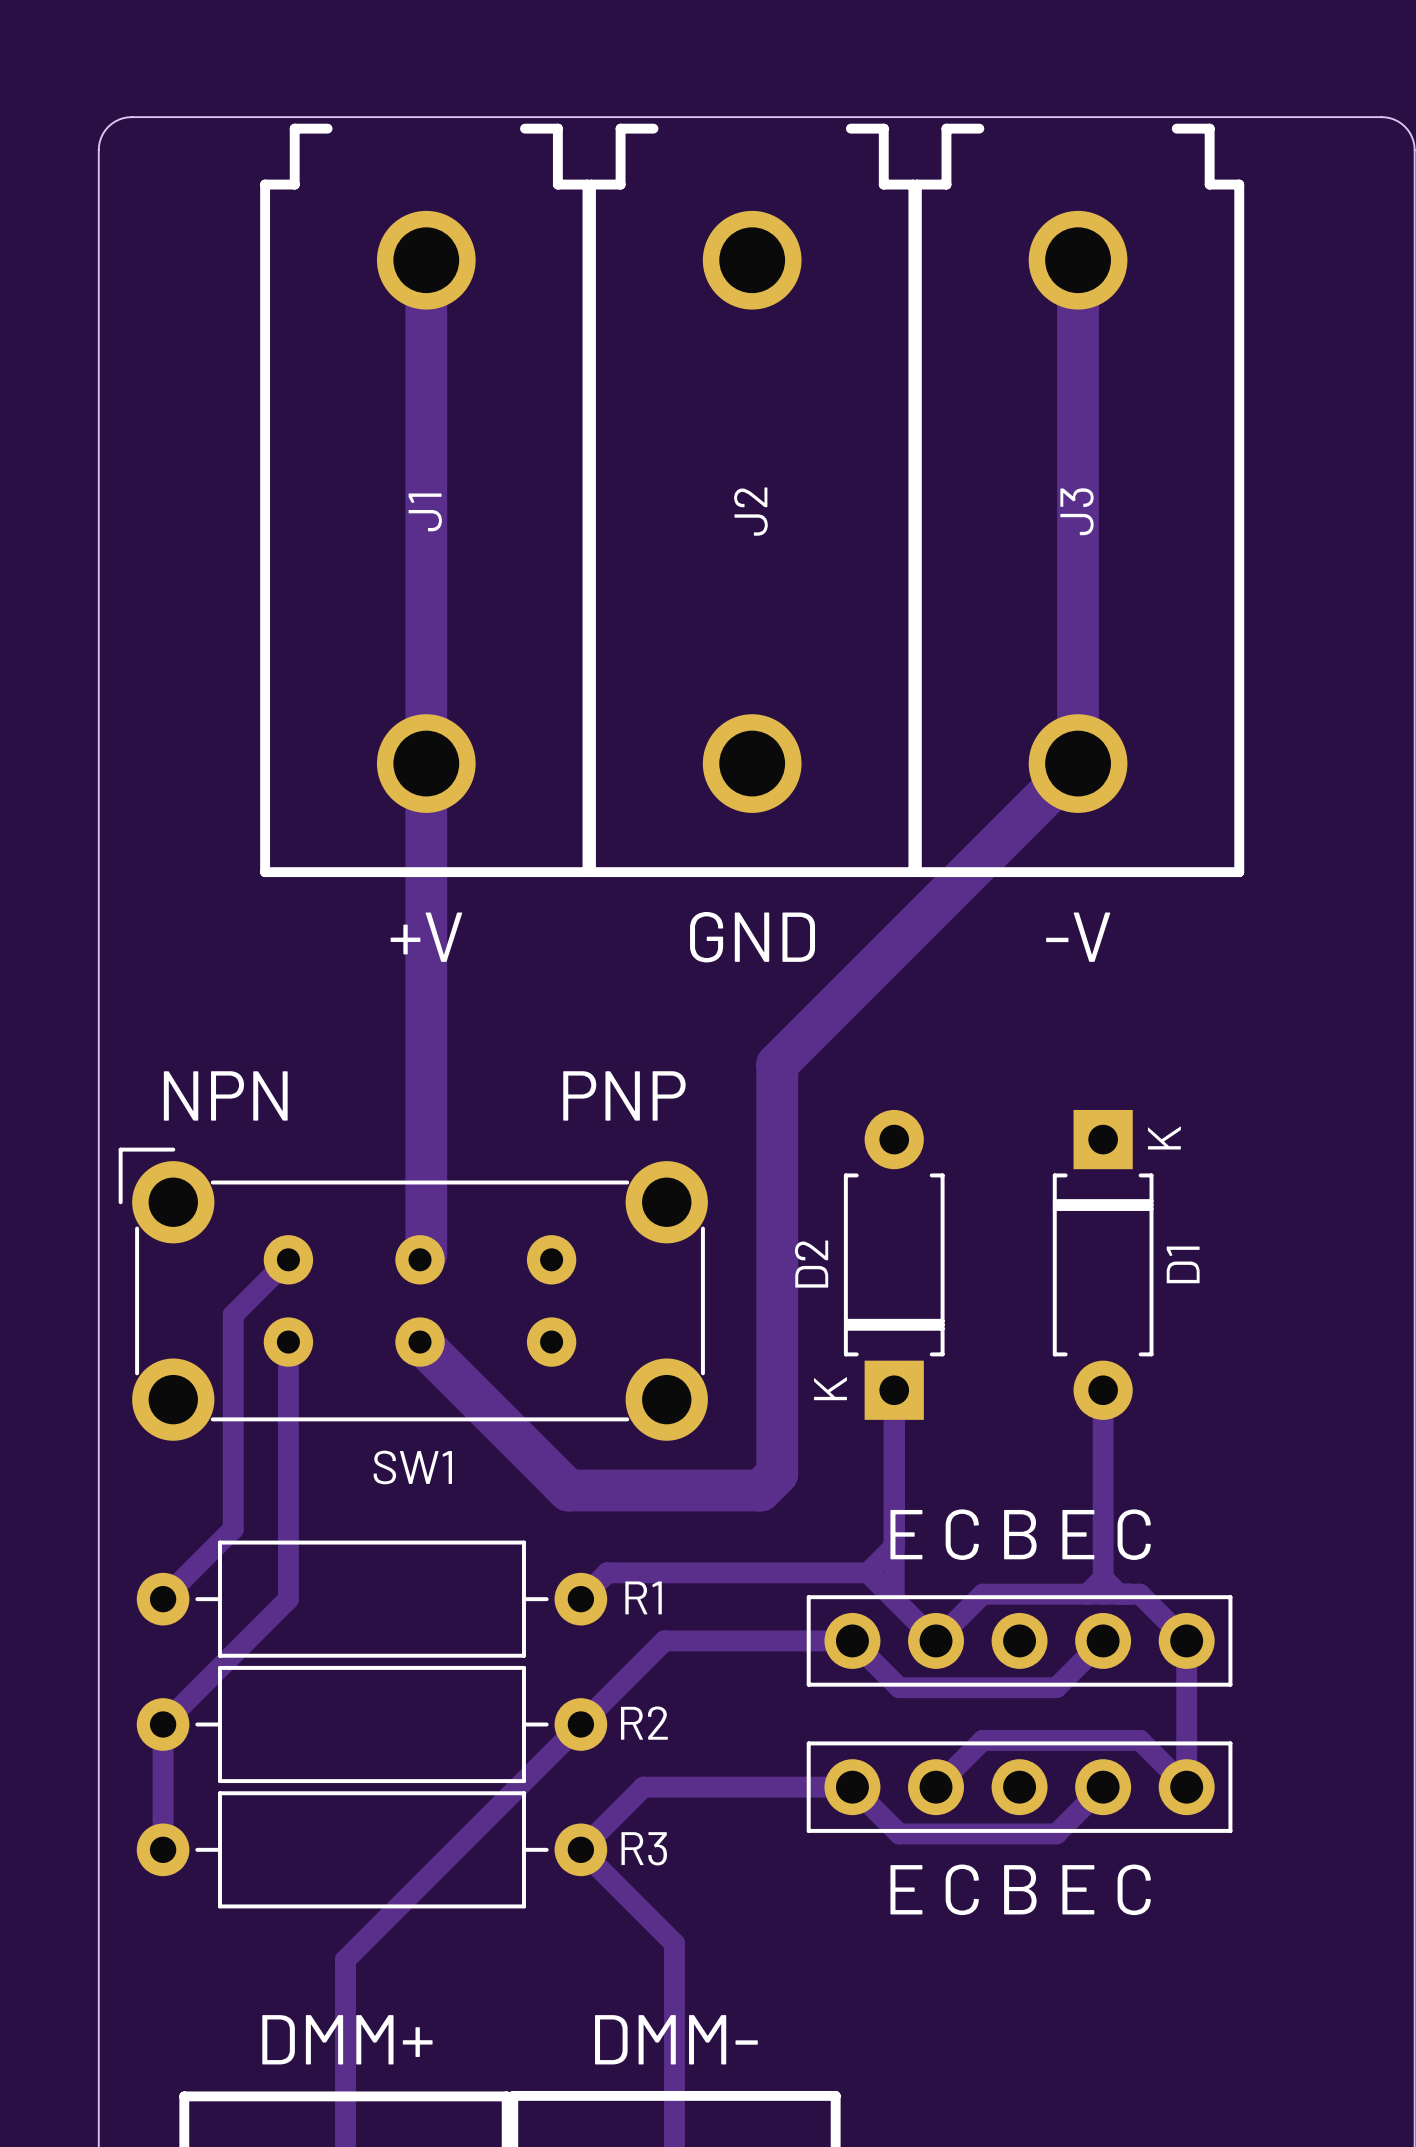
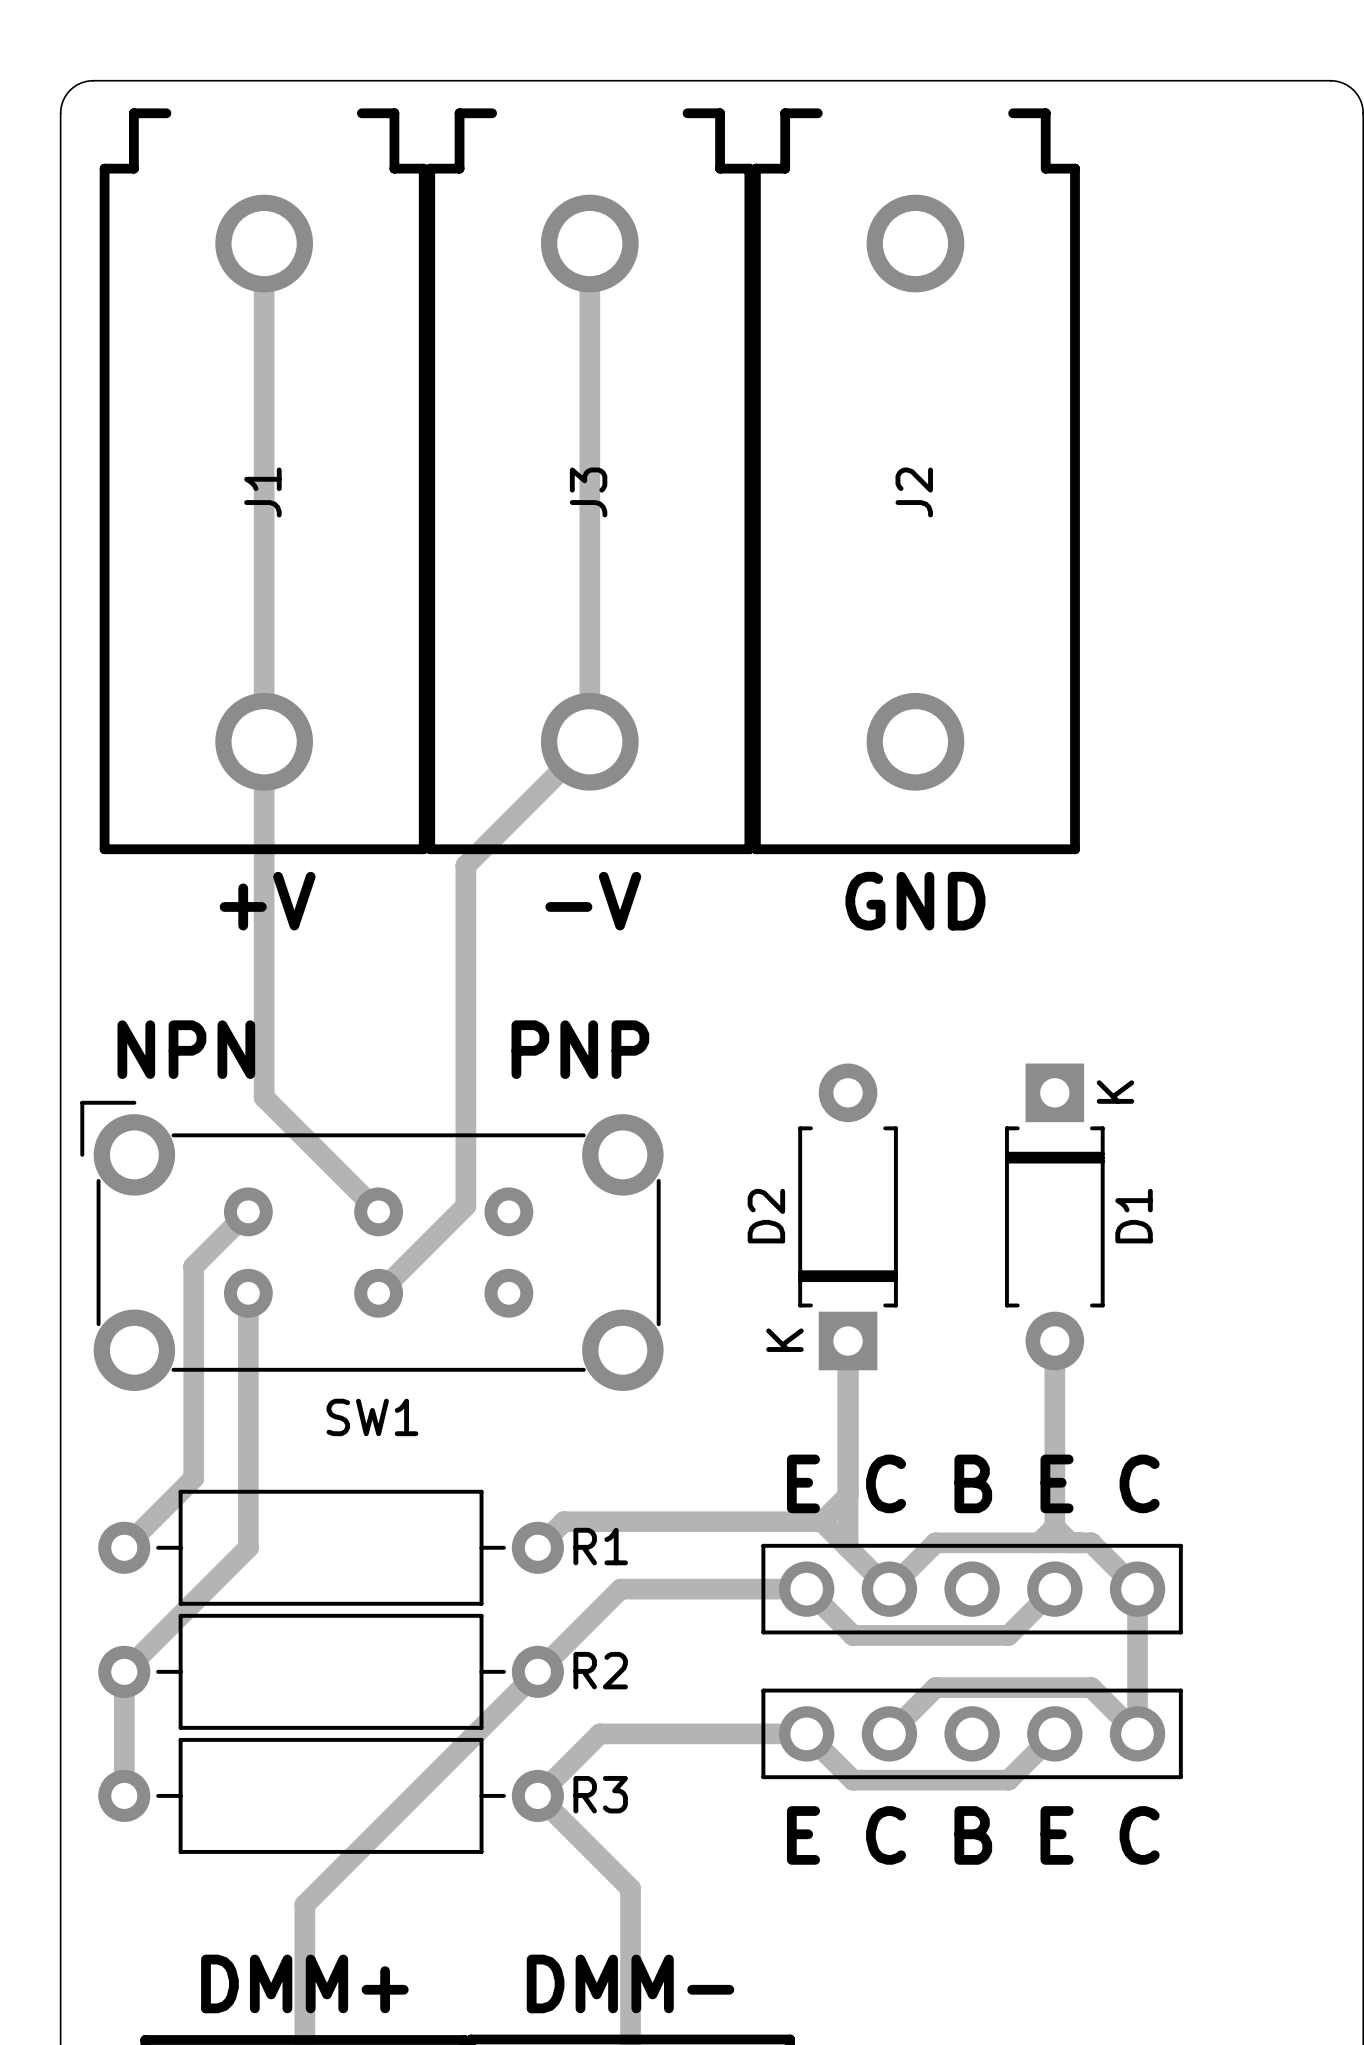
track: (426, 260) (426, 1253) (420, 1259) -> (264, 243) (264, 1097) (378, 1211)
track: (1078, 260) (1078, 763) (777, 1064) (777, 1473) (760, 1490) (568, 1490) (420, 1342) -> (589, 243) (589, 741) (465, 865) (465, 1206) (378, 1293)
J1 position: (426, 500) -> (264, 481)
J2 position: (752, 500) -> (915, 481)
J3 position: (1078, 500) -> (589, 481)
text position: +V (426, 937) -> +V (267, 901)
text position: GND (752, 937) -> GND (915, 901)
text position: -V (1078, 937) -> -V (593, 901)

